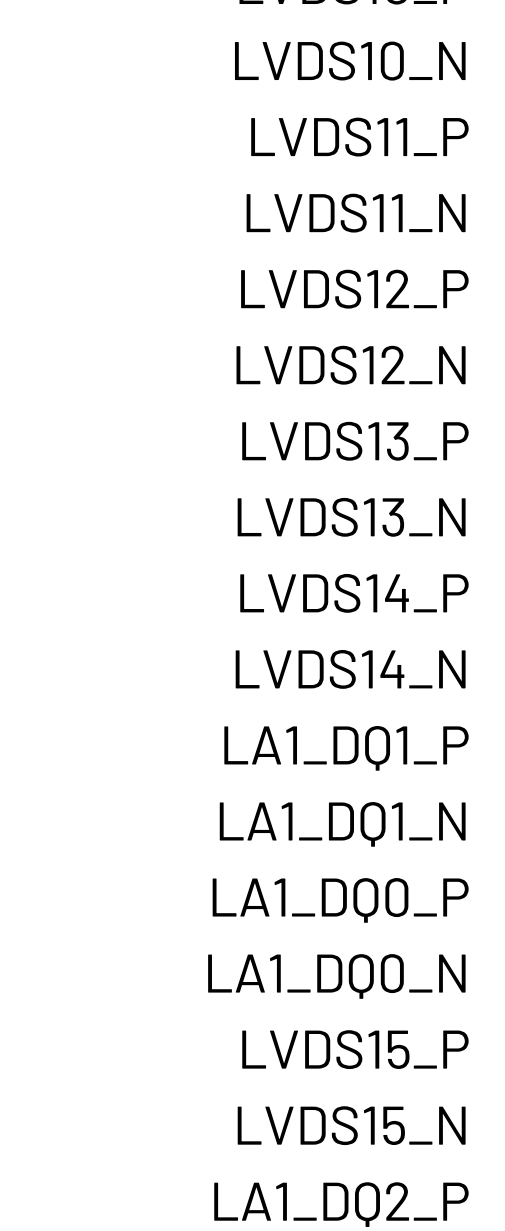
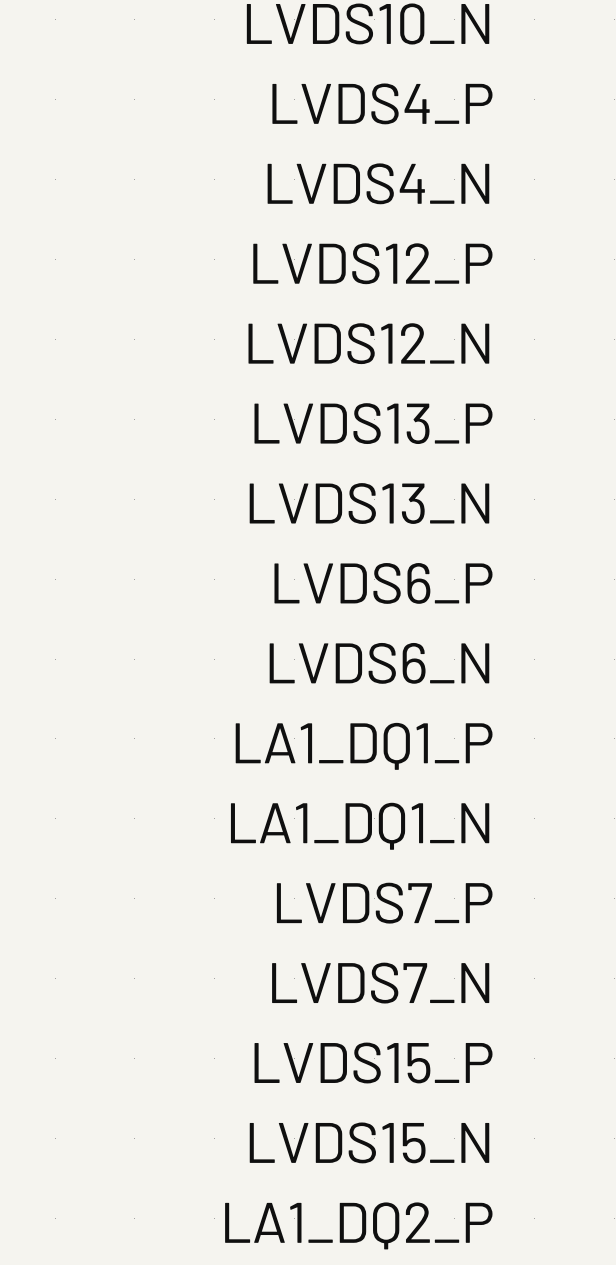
label: LVDS11_P (359, 137) -> LVDS4_P (382, 103)
label: LVDS11_N (356, 213) -> LVDS4_N (378, 183)
label: LVDS14_P (354, 593) -> LVDS6_P (383, 583)
label: LVDS14_N (350, 669) -> LVDS6_N (379, 663)
label: LA1_DQ0_P (340, 900) -> LVDS7_P (384, 903)
label: LA1_DQ0_N (336, 976) -> LVDS7_N (380, 983)

